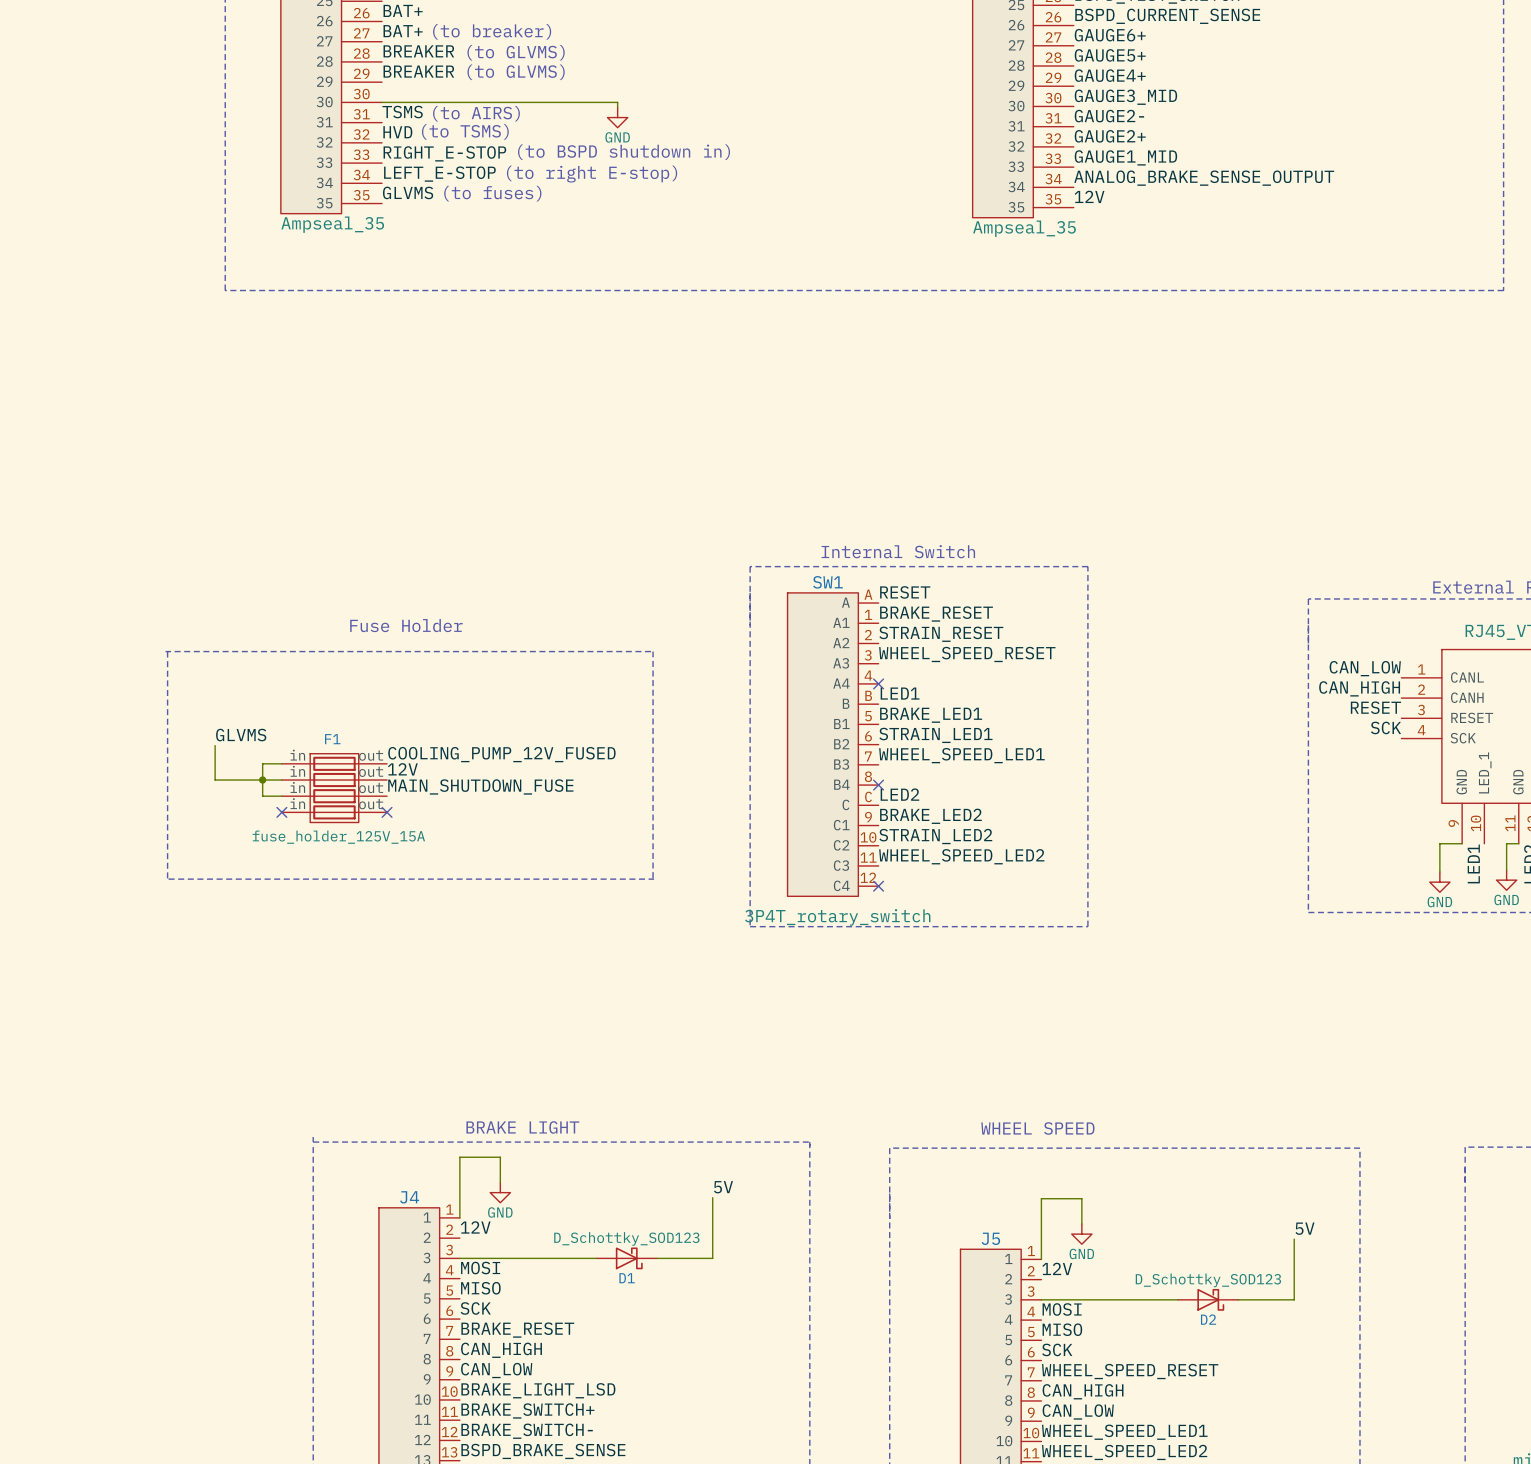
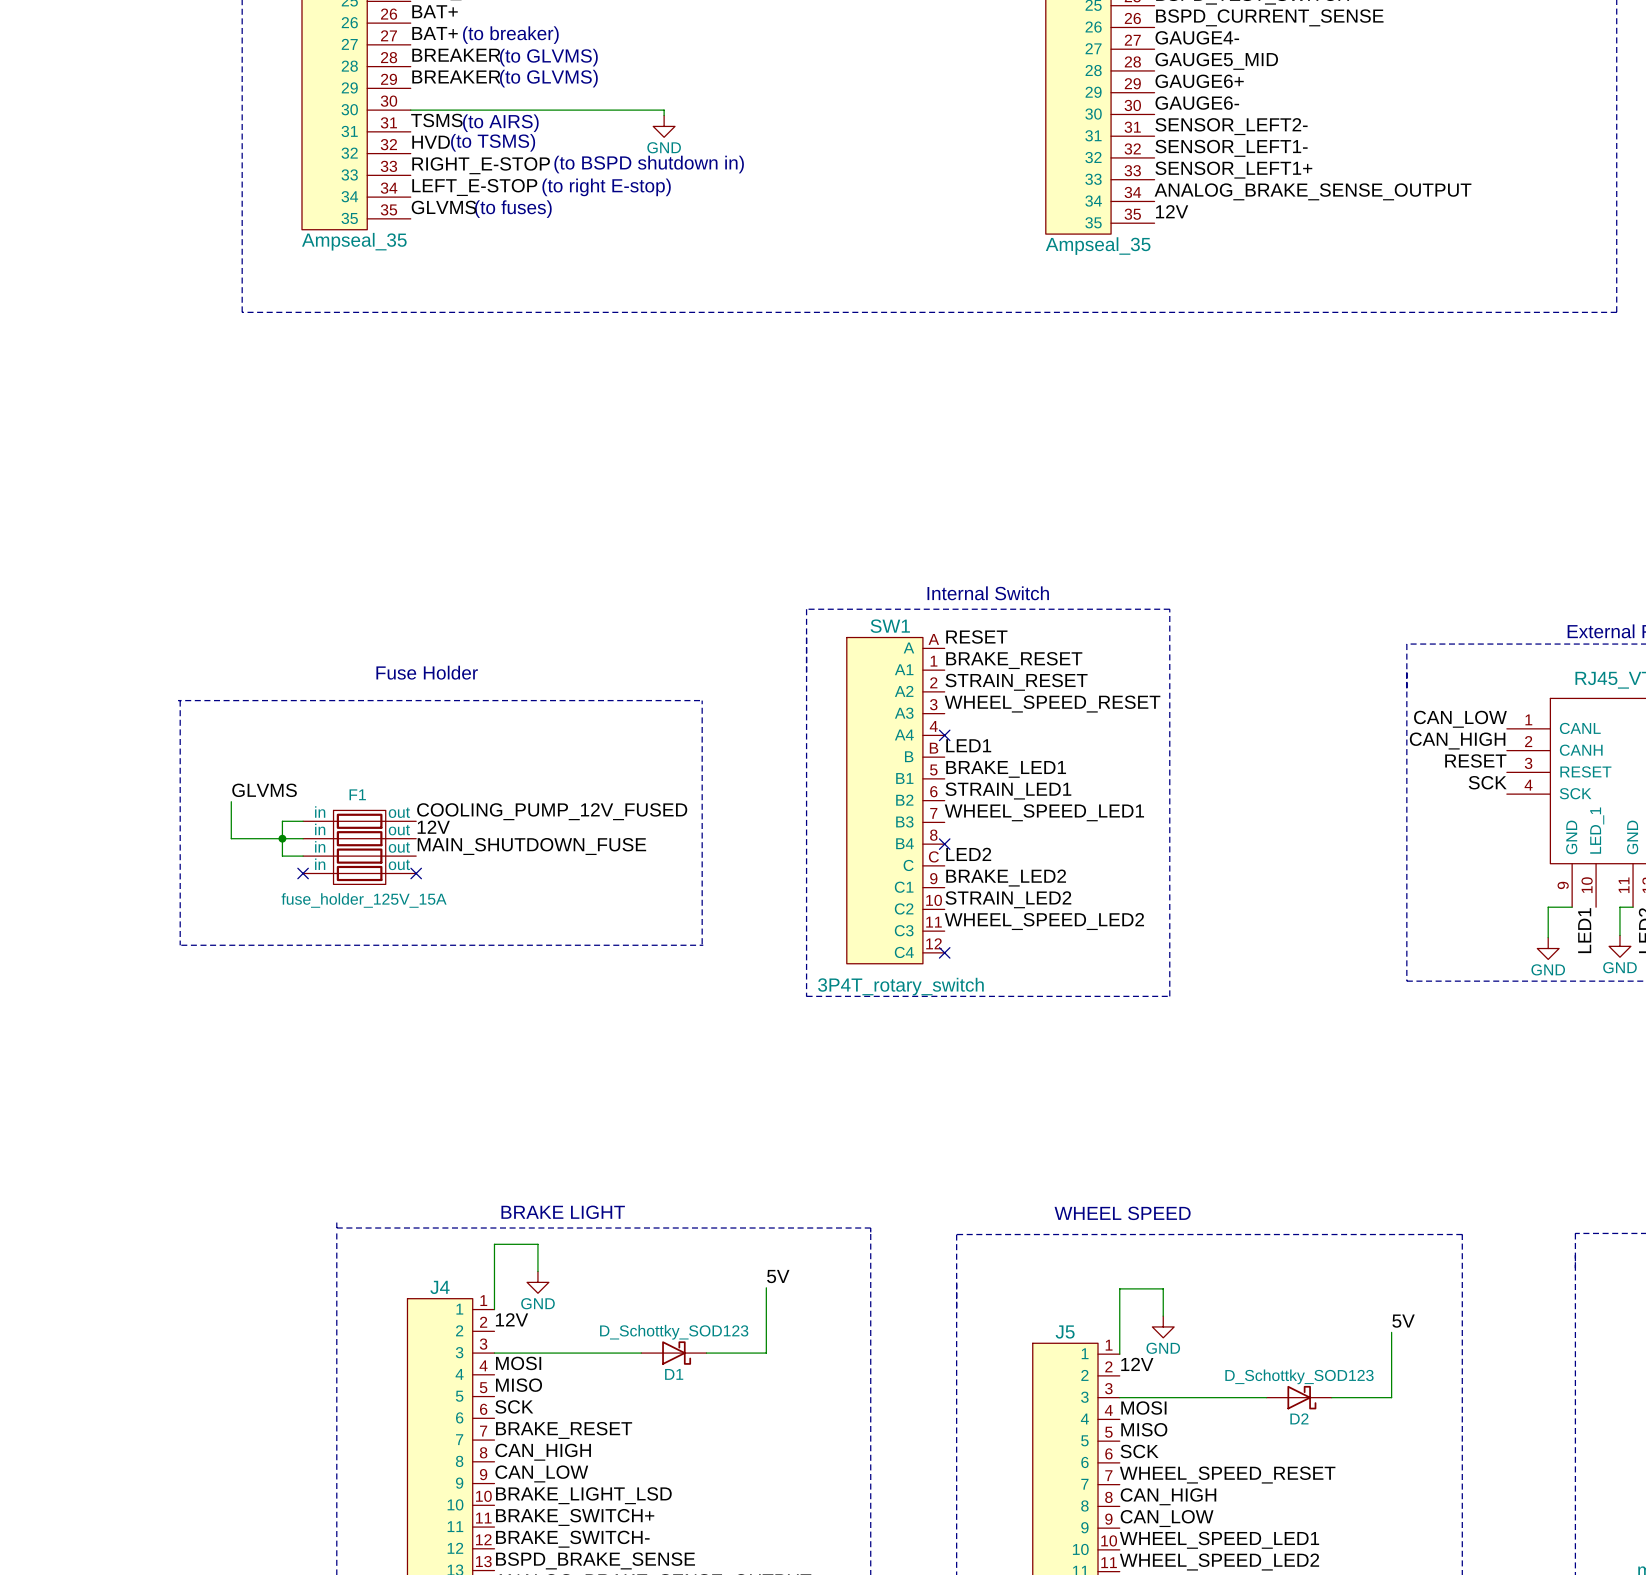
label: GAUGE6+ (1110, 35) -> GAUGE4- (1197, 37)
label: GAUGE5+ (1110, 55) -> GAUGE5_MID (1216, 61)
label: GAUGE4+ (1110, 75) -> GAUGE6+ (1199, 81)
label: GAUGE3_MID (1125, 97) -> GAUGE6- (1197, 103)
label: GAUGE2- (1109, 116) -> SENSOR_LEFT2- (1231, 126)
label: GAUGE2+ (1110, 136) -> SENSOR_LEFT1- (1231, 148)
label: GAUGE1_MID (1125, 157) -> SENSOR_LEFT1+ (1233, 170)

